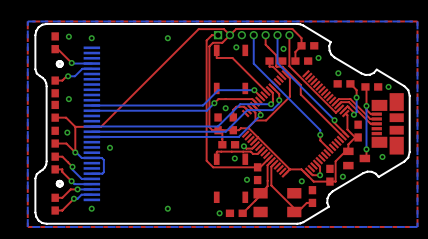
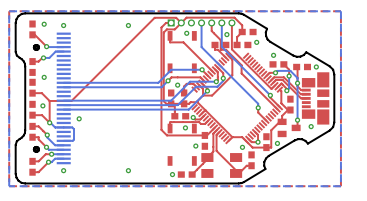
top track: none -> (275, 72) (269, 72) (266, 76)
bottom track: none -> (275, 72) (277, 70) (290, 70) (297, 78) (297, 83)
via: none -> (275, 72)

